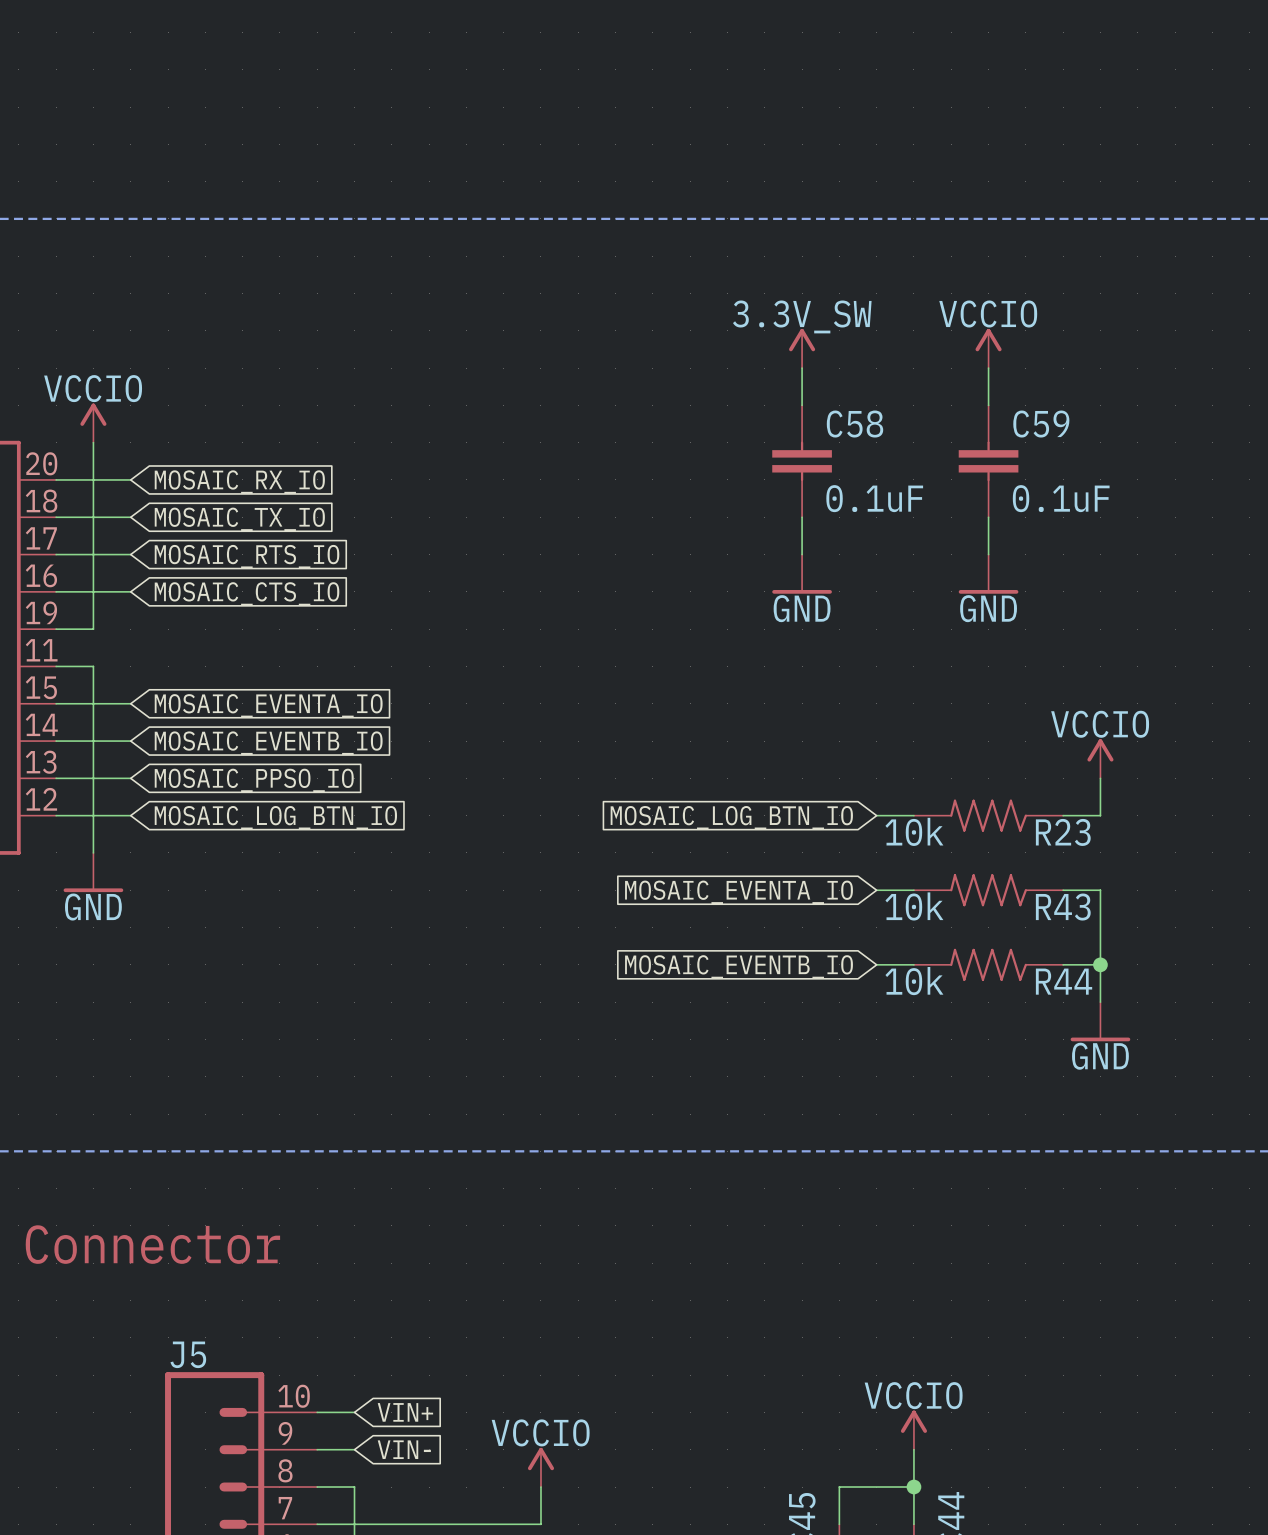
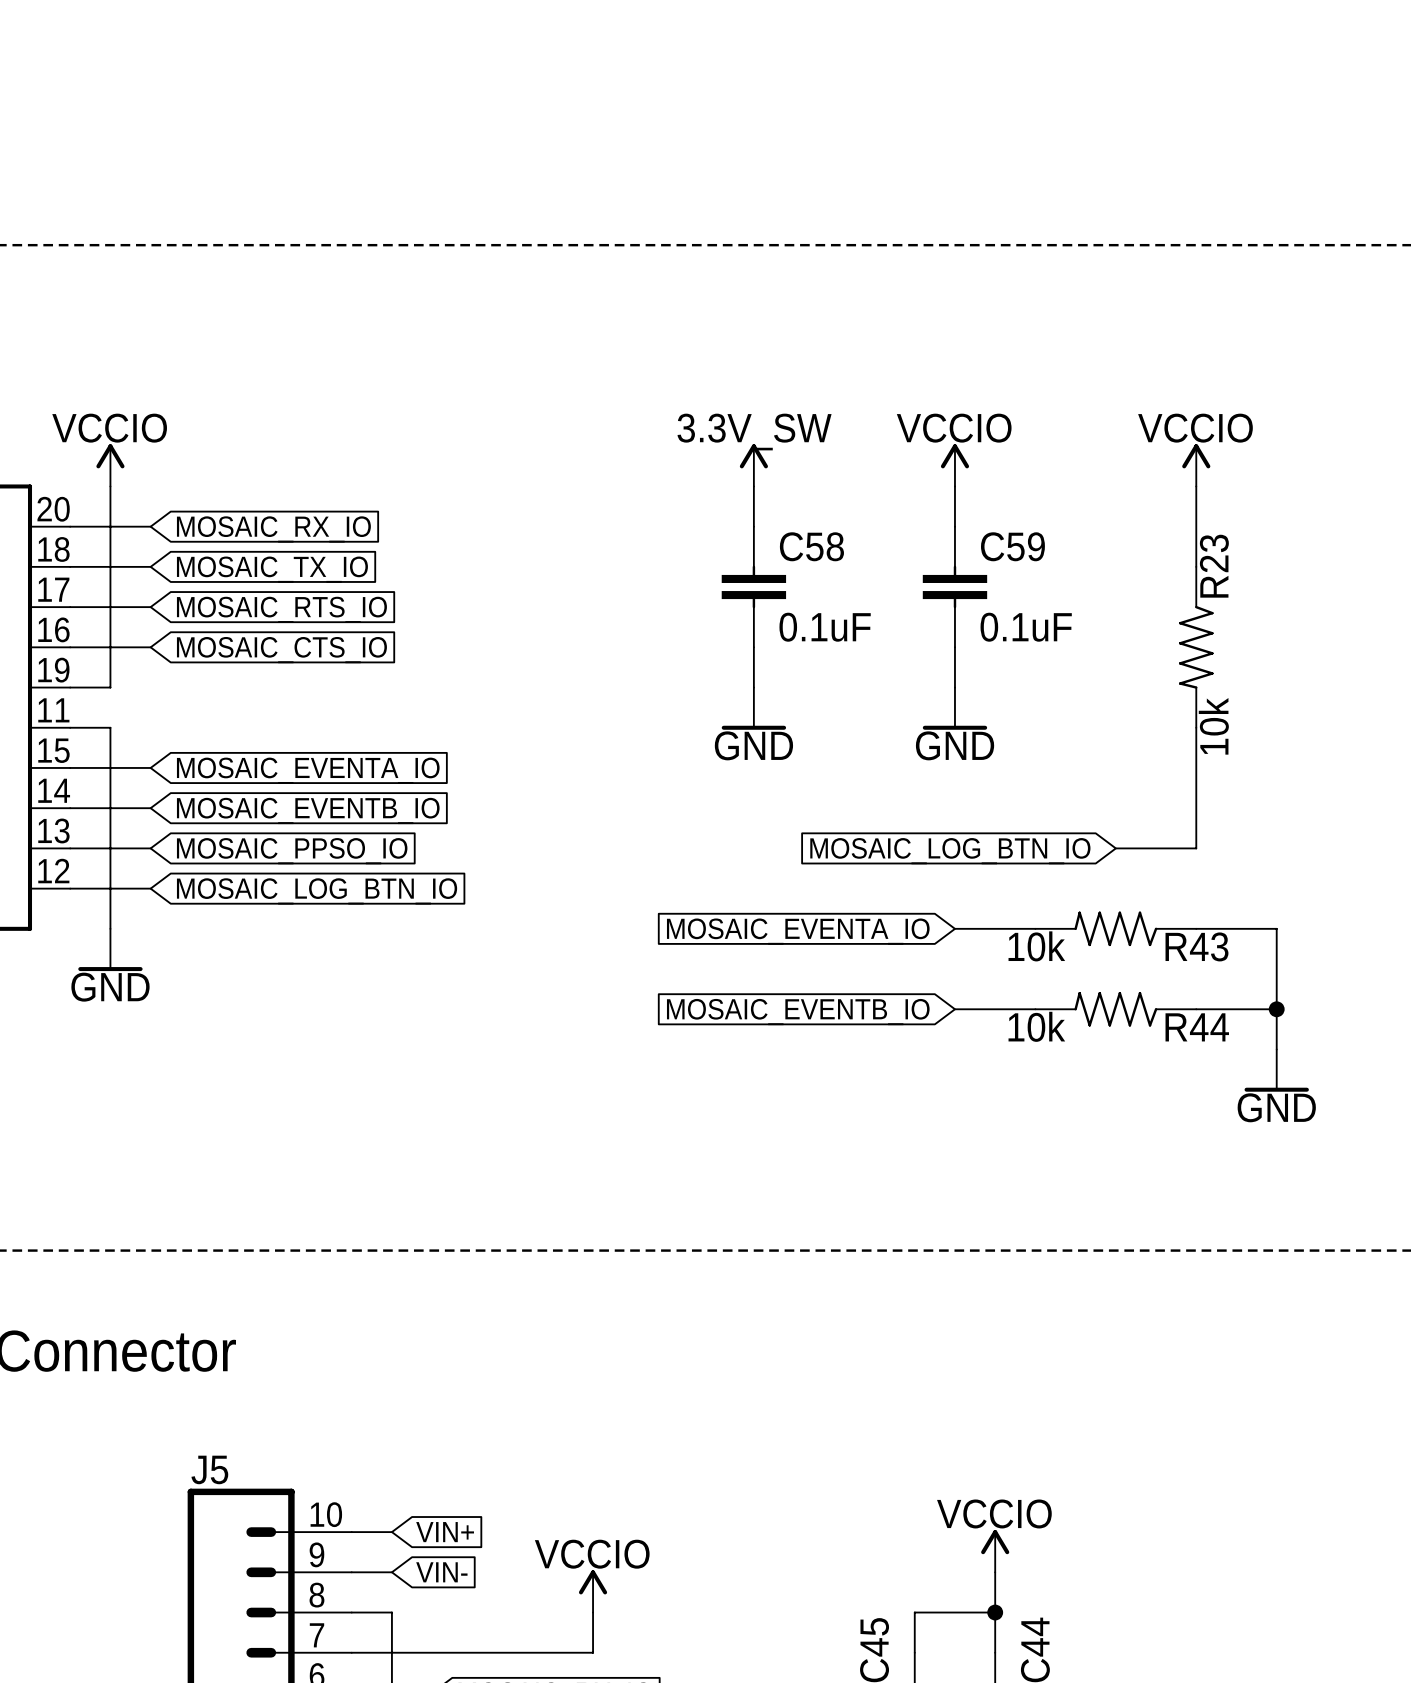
power symbol position: 3.3V_SW (802, 348) -> 3.3V_SW (753, 465)
power symbol: VCCIO (988, 348) -> none
wire: (802, 368) (802, 405) -> (753, 486) (753, 526)
wire: (988, 368) (988, 405) -> (954, 486) (954, 526)
power symbol: none -> VCCIO (954, 465)
power symbol: none -> VCCIO (1196, 465)
wire: none -> (1196, 486) (1196, 566)
C58 position: (802, 461) -> (753, 587)
C59 position: (988, 461) -> (954, 587)
wire: (802, 517) (802, 554) -> (753, 647) (753, 687)
wire: (988, 517) (988, 554) -> (954, 647) (954, 687)
power symbol: GND (802, 574) -> none
power symbol: GND (988, 574) -> none
power symbol: none -> GND (753, 708)
power symbol: none -> GND (954, 708)
wire: none -> (1196, 727) (1196, 848) (1115, 848)
power symbol: VCCIO (1100, 758) -> none
wire: (1100, 778) (1100, 815) (1063, 815) -> none
wire: (876, 815) (913, 815) -> none
R23 rotation: 0° (988, 815) -> 90° counterclockwise (1196, 647)
R23 position: (988, 815) -> (1196, 647)
global label position: MOSAIC_LOG_BTN_IO (731, 817) -> MOSAIC_LOG_BTN_IO (950, 851)
wire: none -> (954, 928) (1035, 928)
wire: none -> (1196, 928) (1276, 928) (1276, 1049)
wire: (876, 890) (913, 890) -> none
R43 position: (988, 890) -> (1115, 928)
wire: (1063, 890) (1100, 890) (1100, 1002) -> none
global label position: MOSAIC_EVENTA_IO (739, 892) -> MOSAIC_EVENTA_IO (798, 931)
wire: none -> (954, 1009) (1035, 1009)
wire: none -> (1196, 1009) (1276, 1009)
wire: (876, 964) (913, 964) -> none
R44 position: (988, 964) -> (1115, 1009)
wire: (1063, 964) (1100, 964) -> none
junction position: (1100, 964) -> (1276, 1009)
global label position: MOSAIC_EVENTB_IO (739, 966) -> MOSAIC_EVENTB_IO (798, 1012)
power symbol position: GND (1100, 1021) -> GND (1276, 1070)

